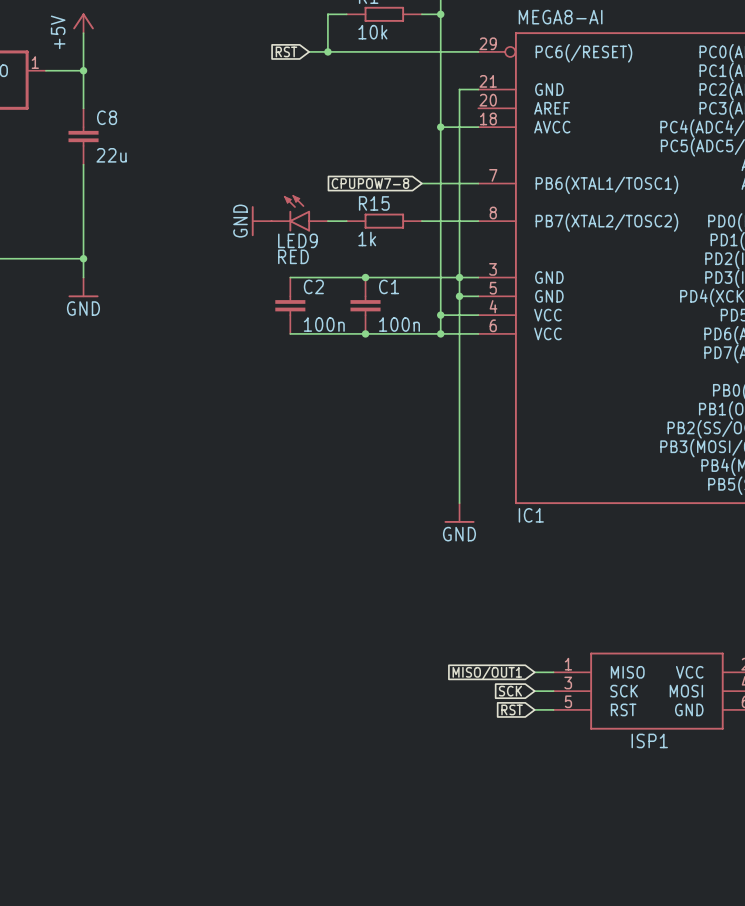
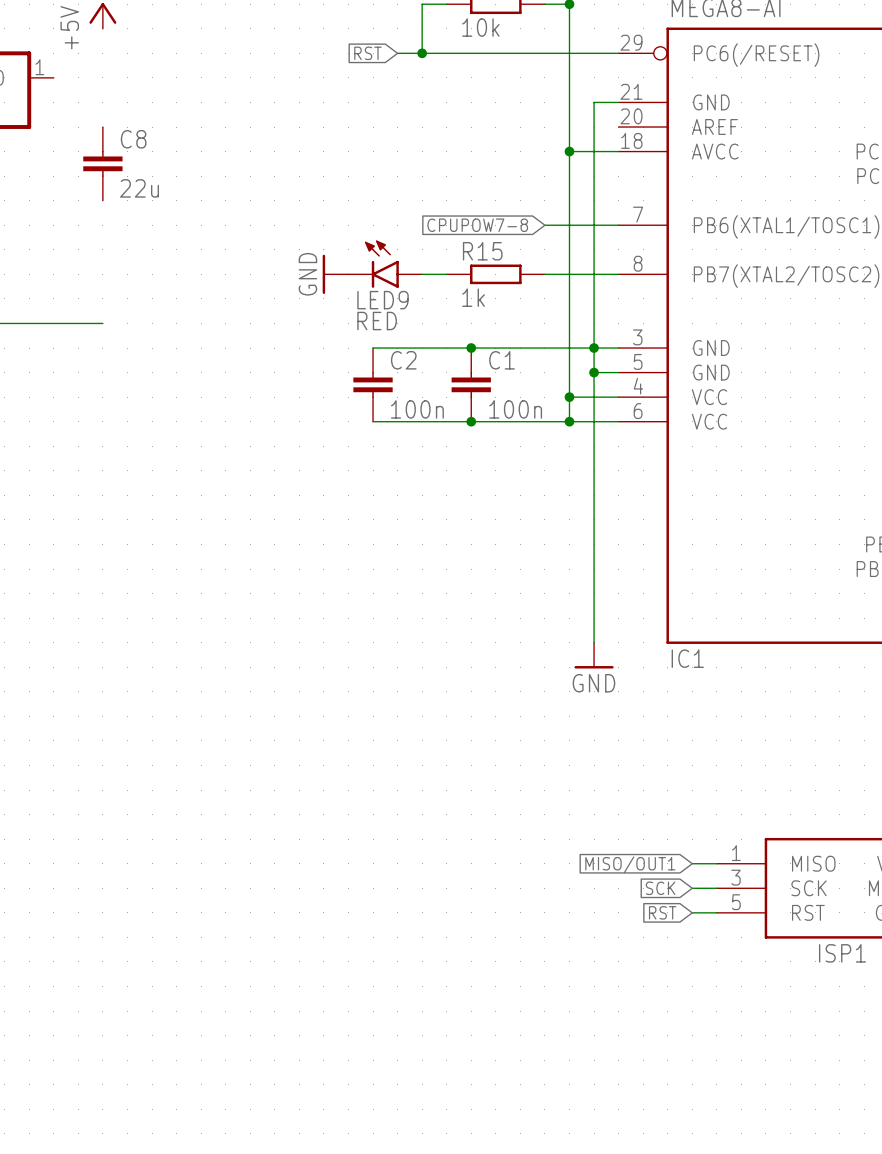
wire: (83, 33) (83, 108) -> none
wire: (45, 70) (83, 70) -> none
junction: (83, 70) -> none
wire: (83, 164) (83, 277) -> none
junction: (83, 258) -> none
power symbol: GND (83, 287) -> none

